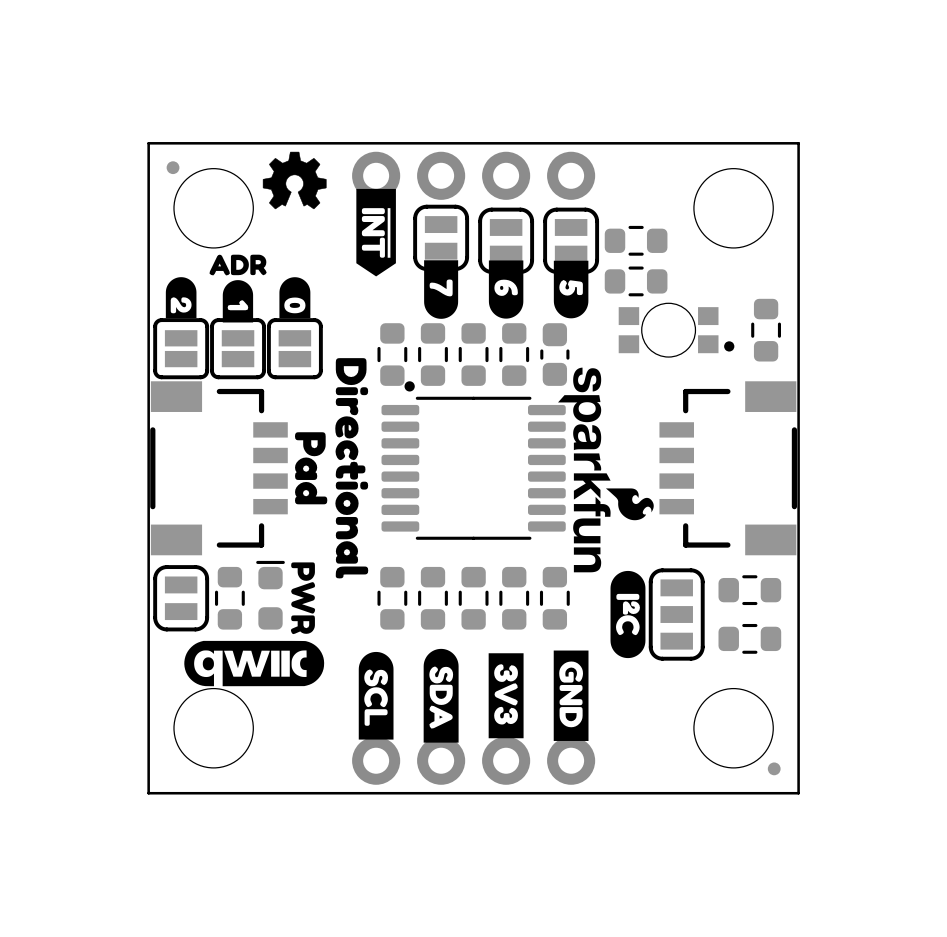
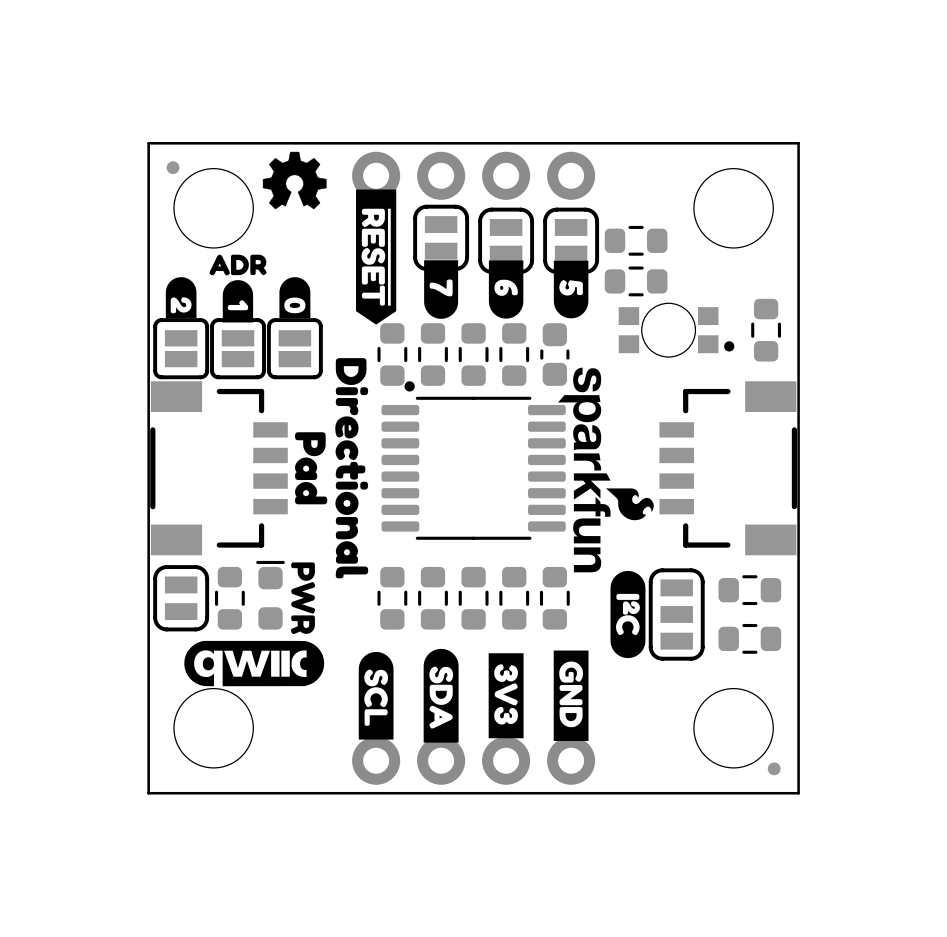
drawing shape: [356, 188, 396, 277] -> [356, 189, 397, 325]

